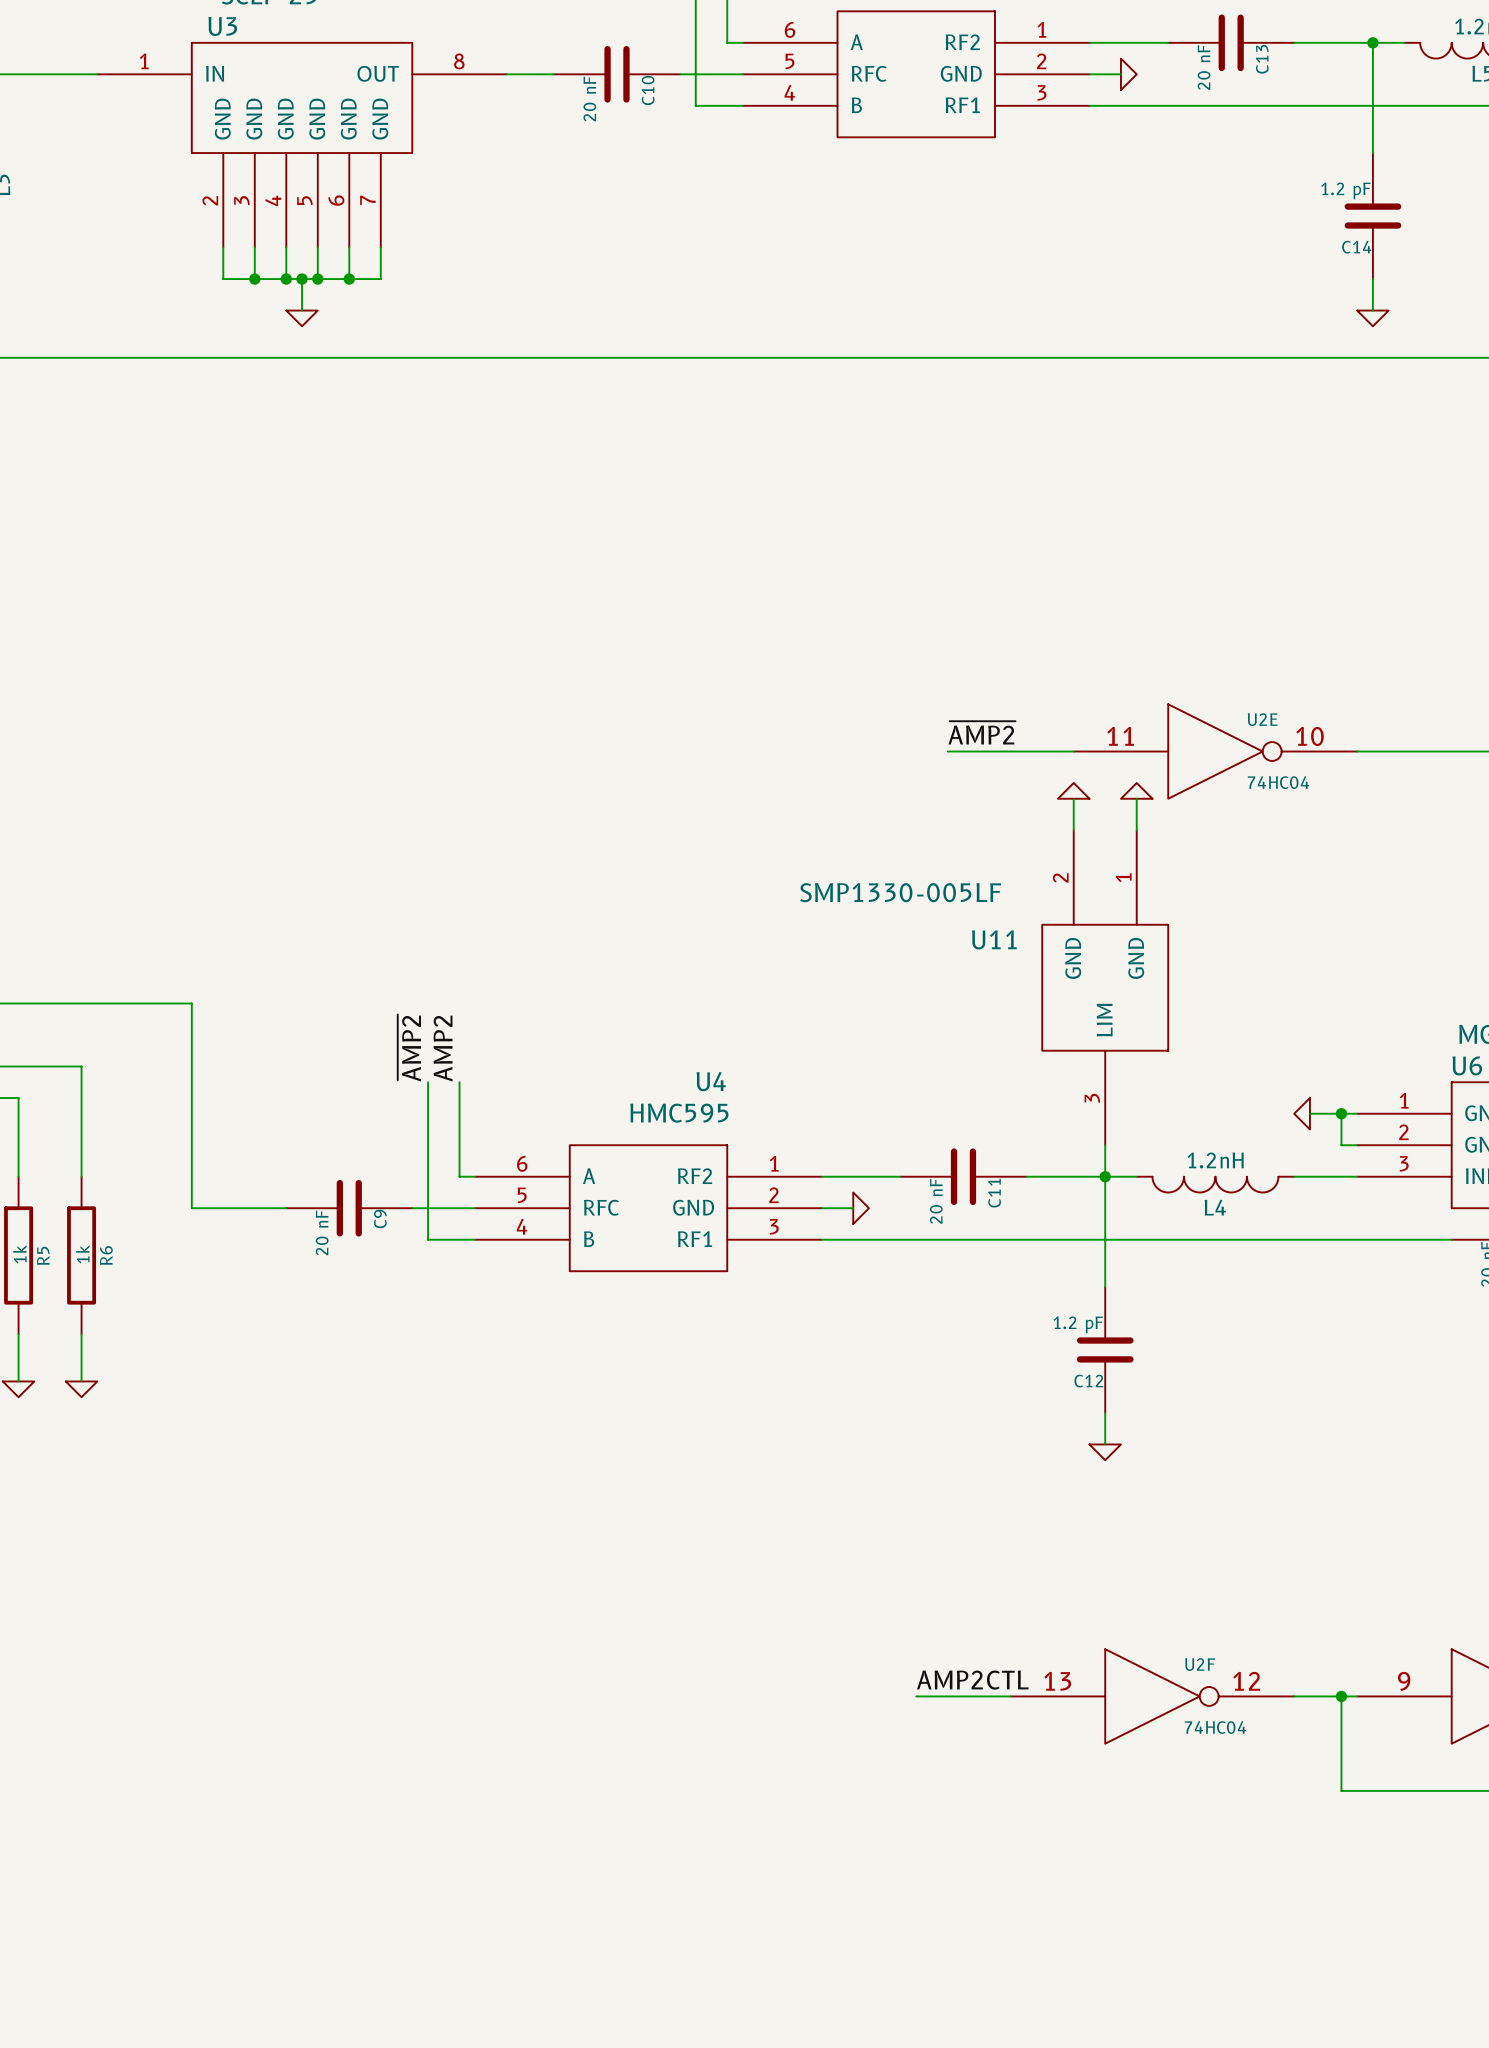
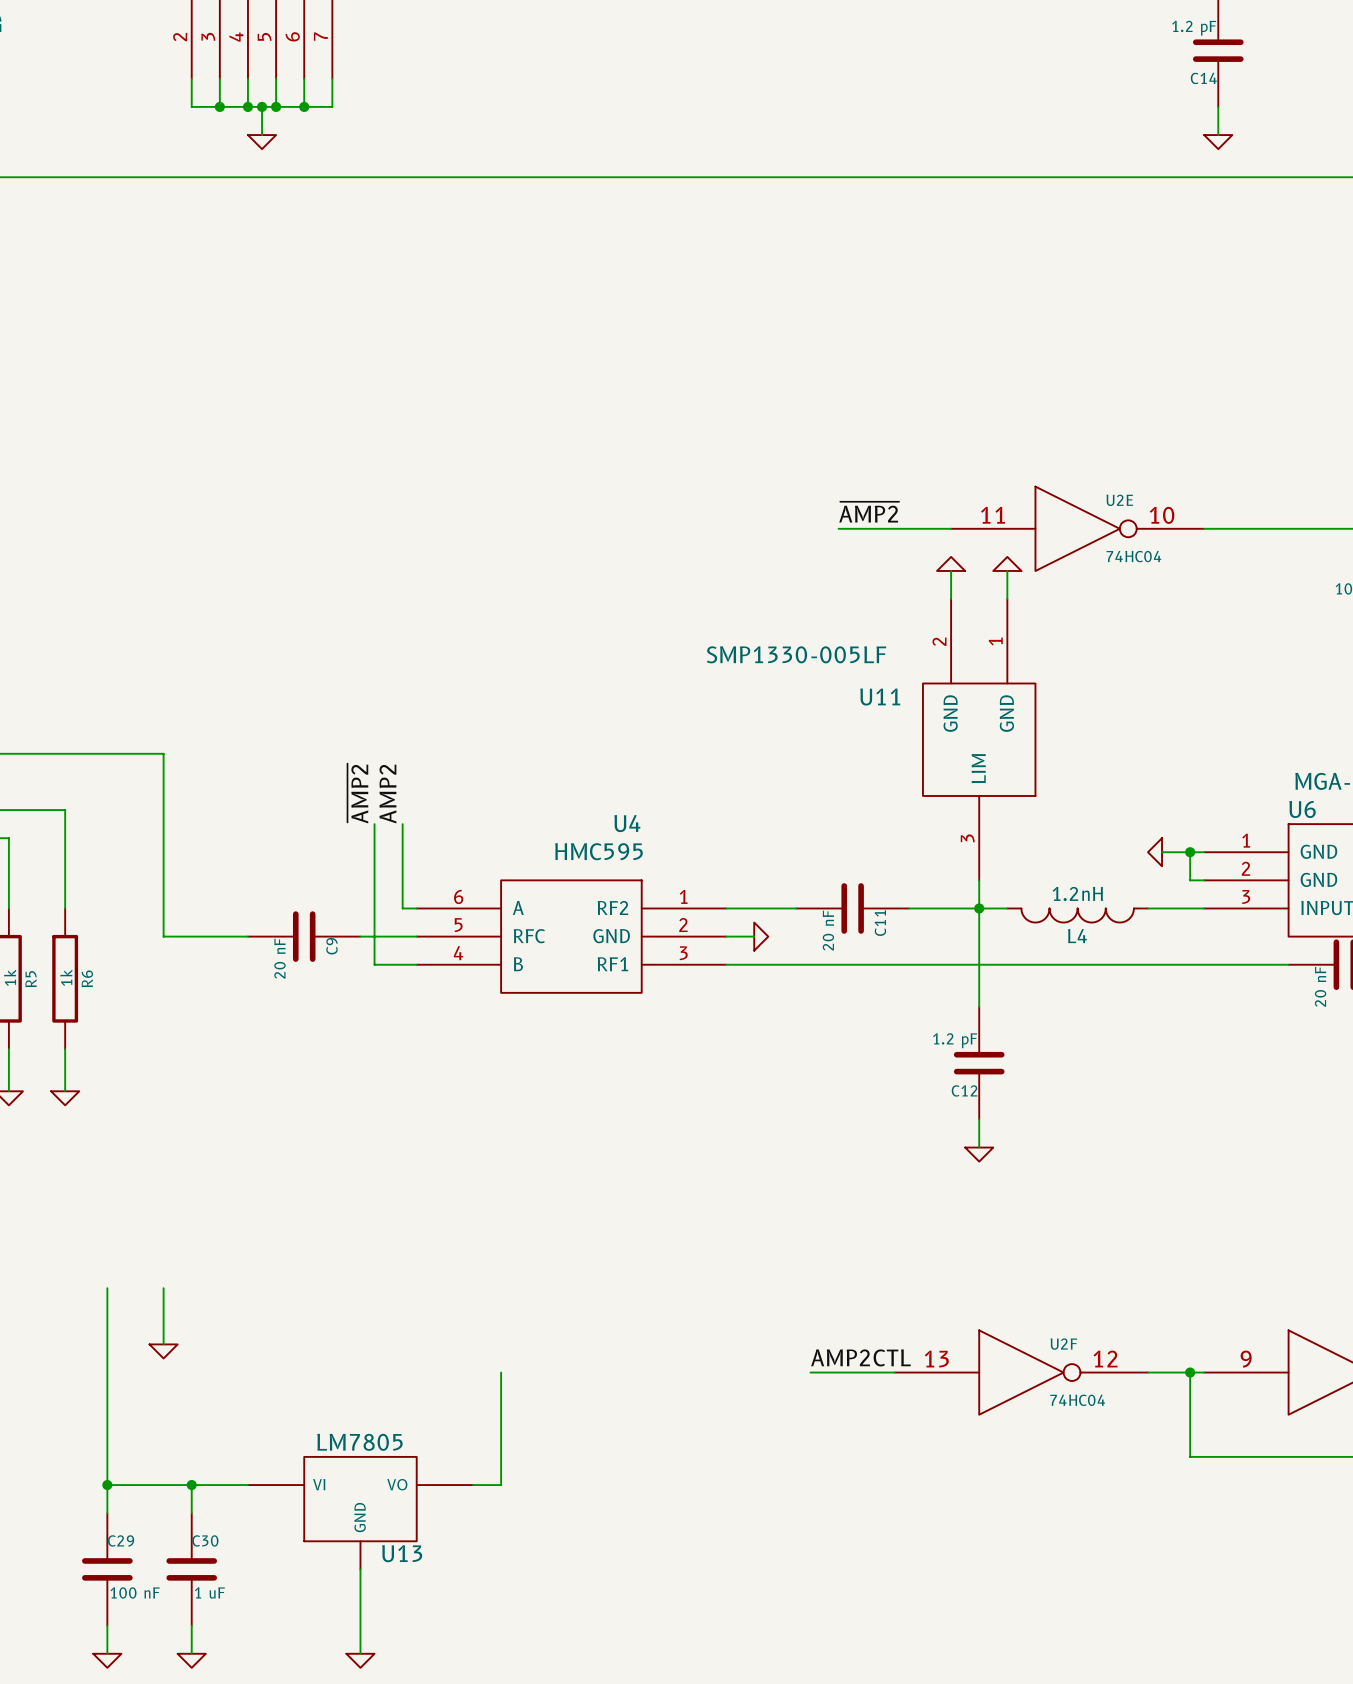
wire: none -> (107, 1288) (107, 1513)
wire: none -> (163, 1288) (163, 1344)
power symbol: none -> (163, 1351)
wire: none -> (501, 1372) (501, 1485) (472, 1485)
wire: none -> (107, 1485) (247, 1485)
junction: none -> (107, 1485)
wire: none -> (191, 1485) (191, 1513)
junction: none -> (191, 1485)
U13: none -> LM7805 (360, 1513)
C29: none -> 100 nF (107, 1569)
C30: none -> 1 uF (191, 1569)
wire: none -> (360, 1569) (360, 1653)
wire: none -> (107, 1625) (107, 1653)
wire: none -> (191, 1625) (191, 1653)
power symbol: none -> (107, 1660)
power symbol: none -> (191, 1660)
power symbol: none -> (360, 1660)

